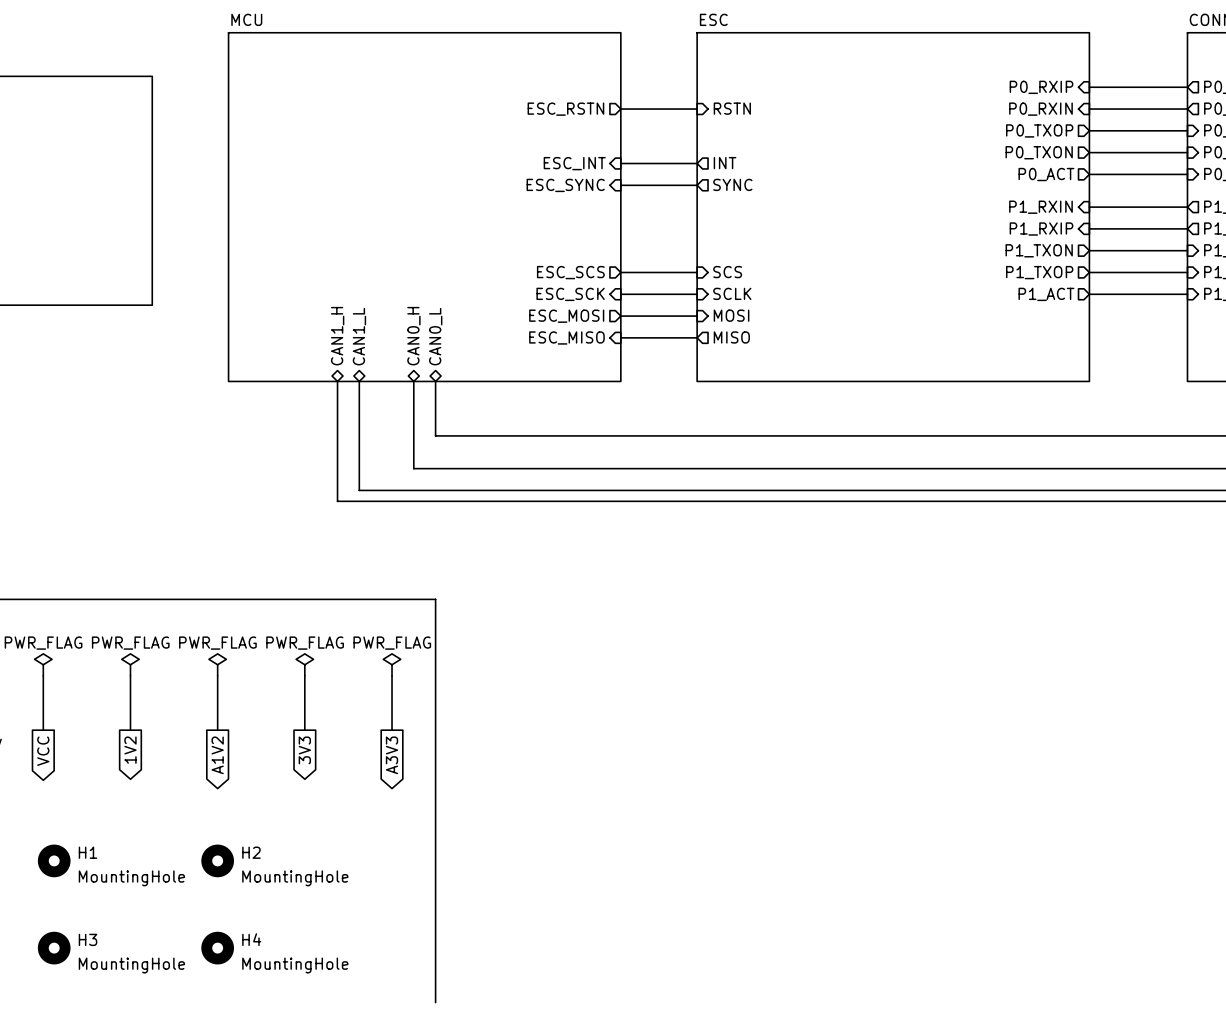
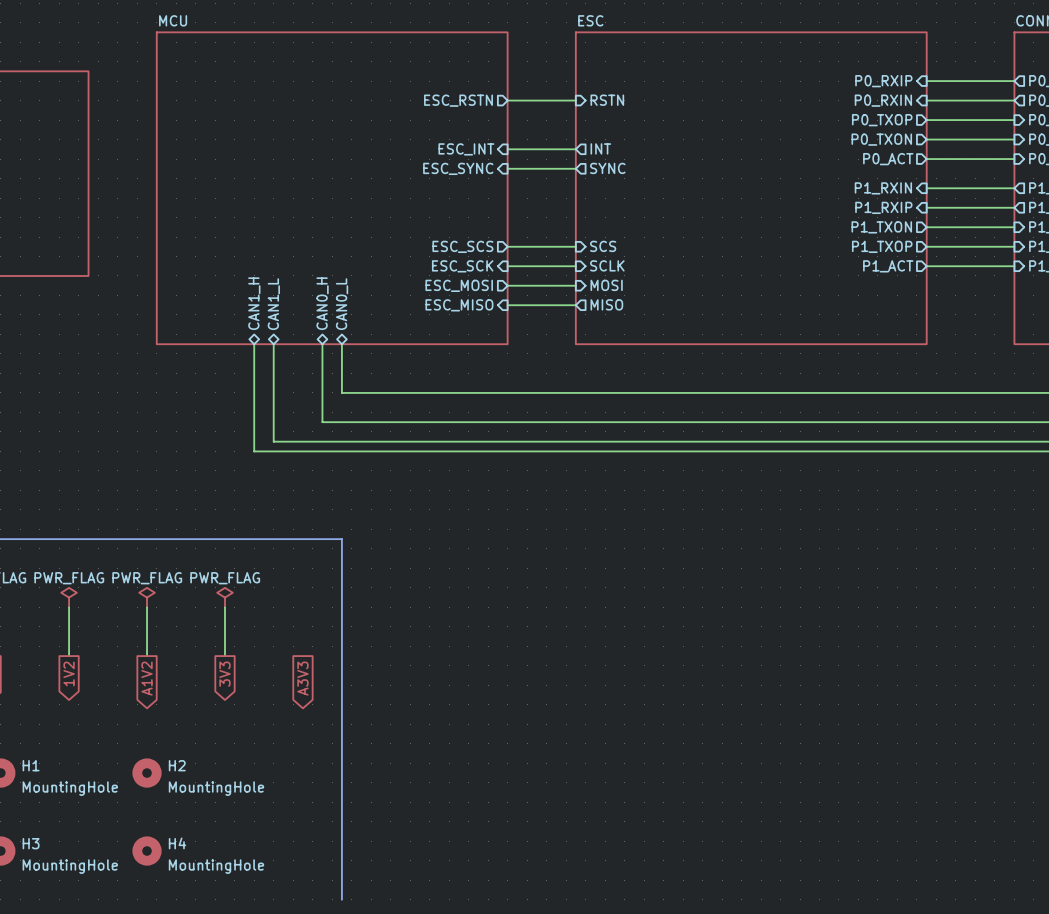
power symbol: PWR_FLAG (392, 664) -> none
wire: (392, 675) (392, 730) -> none

